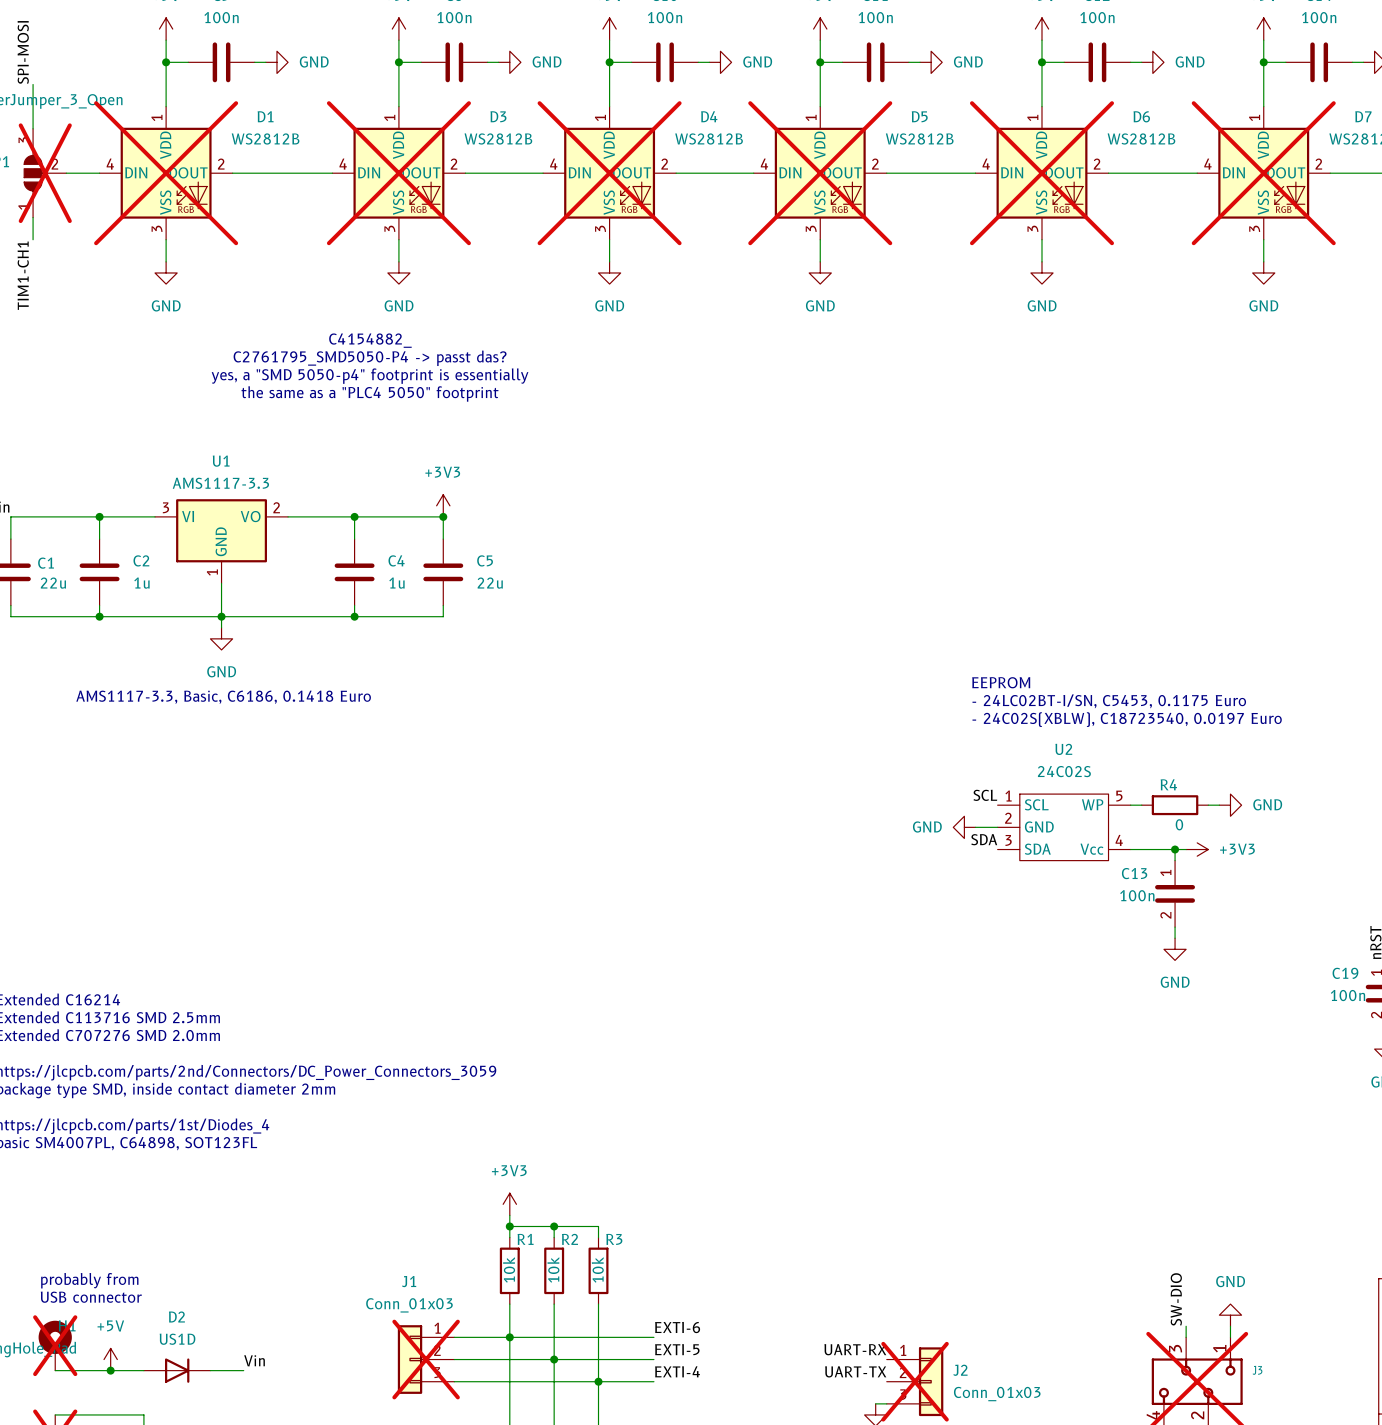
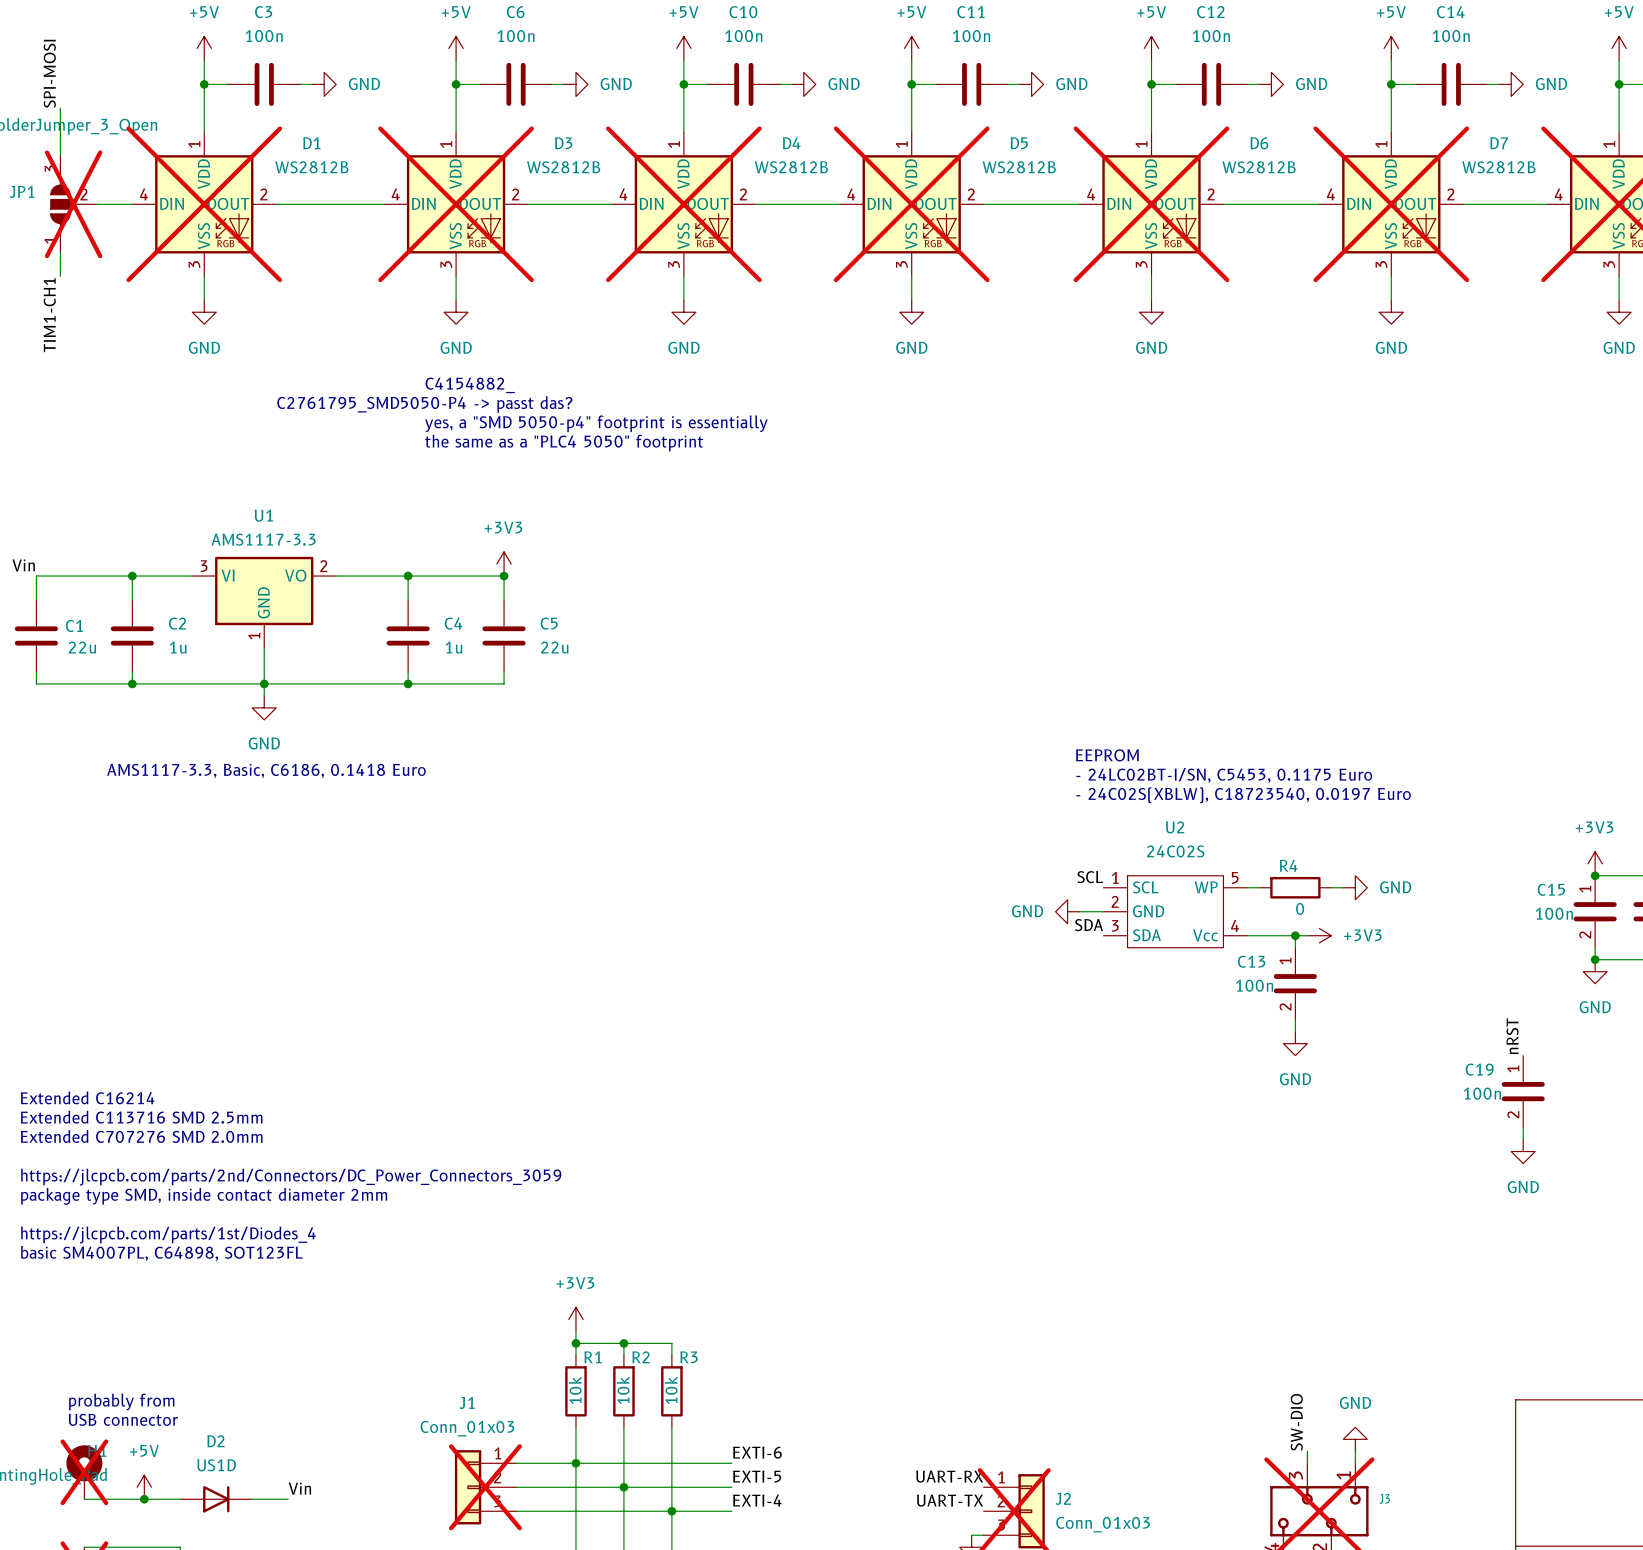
text position: C4154882_ (370, 340) -> C4154882_ (470, 385)
text position: yes, a "SMD 5050-p4" footprint is essentially (370, 376) -> yes, a "SMD 5050-p4" footprint is essentially (596, 423)
text position: the same as a "PLC4 5050" footprint (370, 393) -> the same as a "PLC4 5050" footprint (564, 443)

